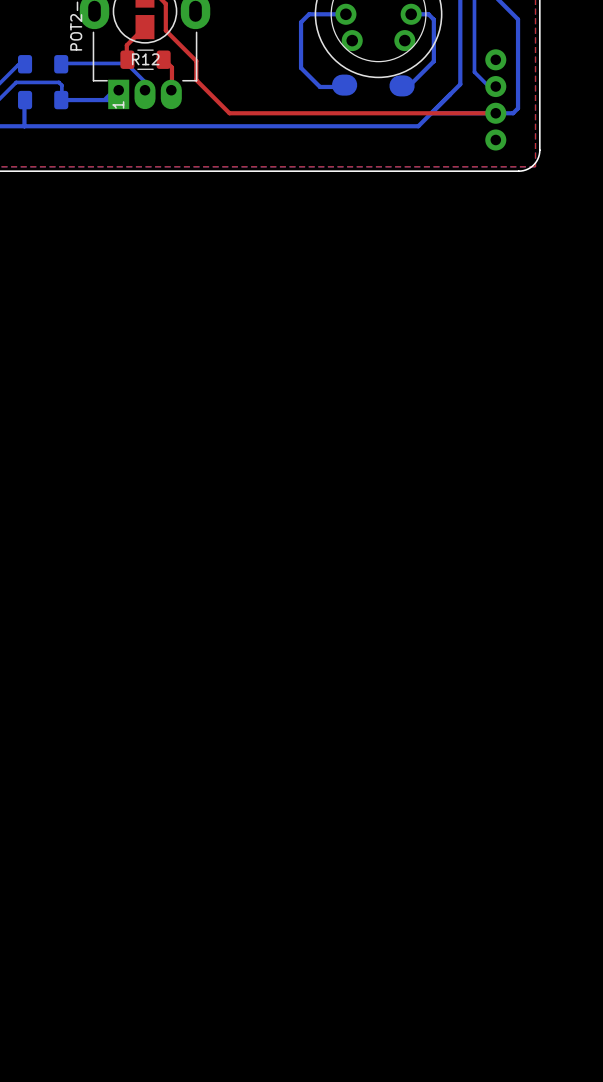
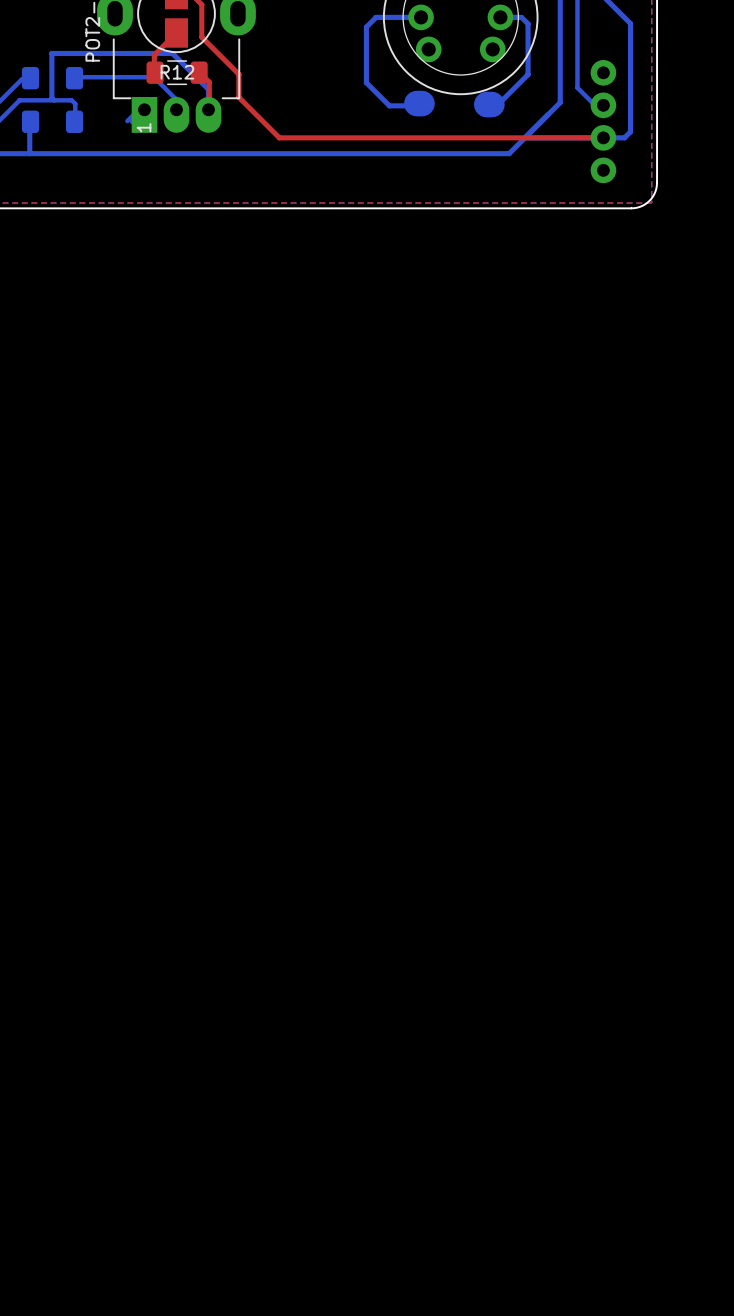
bottom track: none -> (53, 100) (51, 98) (51, 53) (172, 53) (208, 89) (208, 109)
bottom track: (61, 100) (108, 100) -> none

